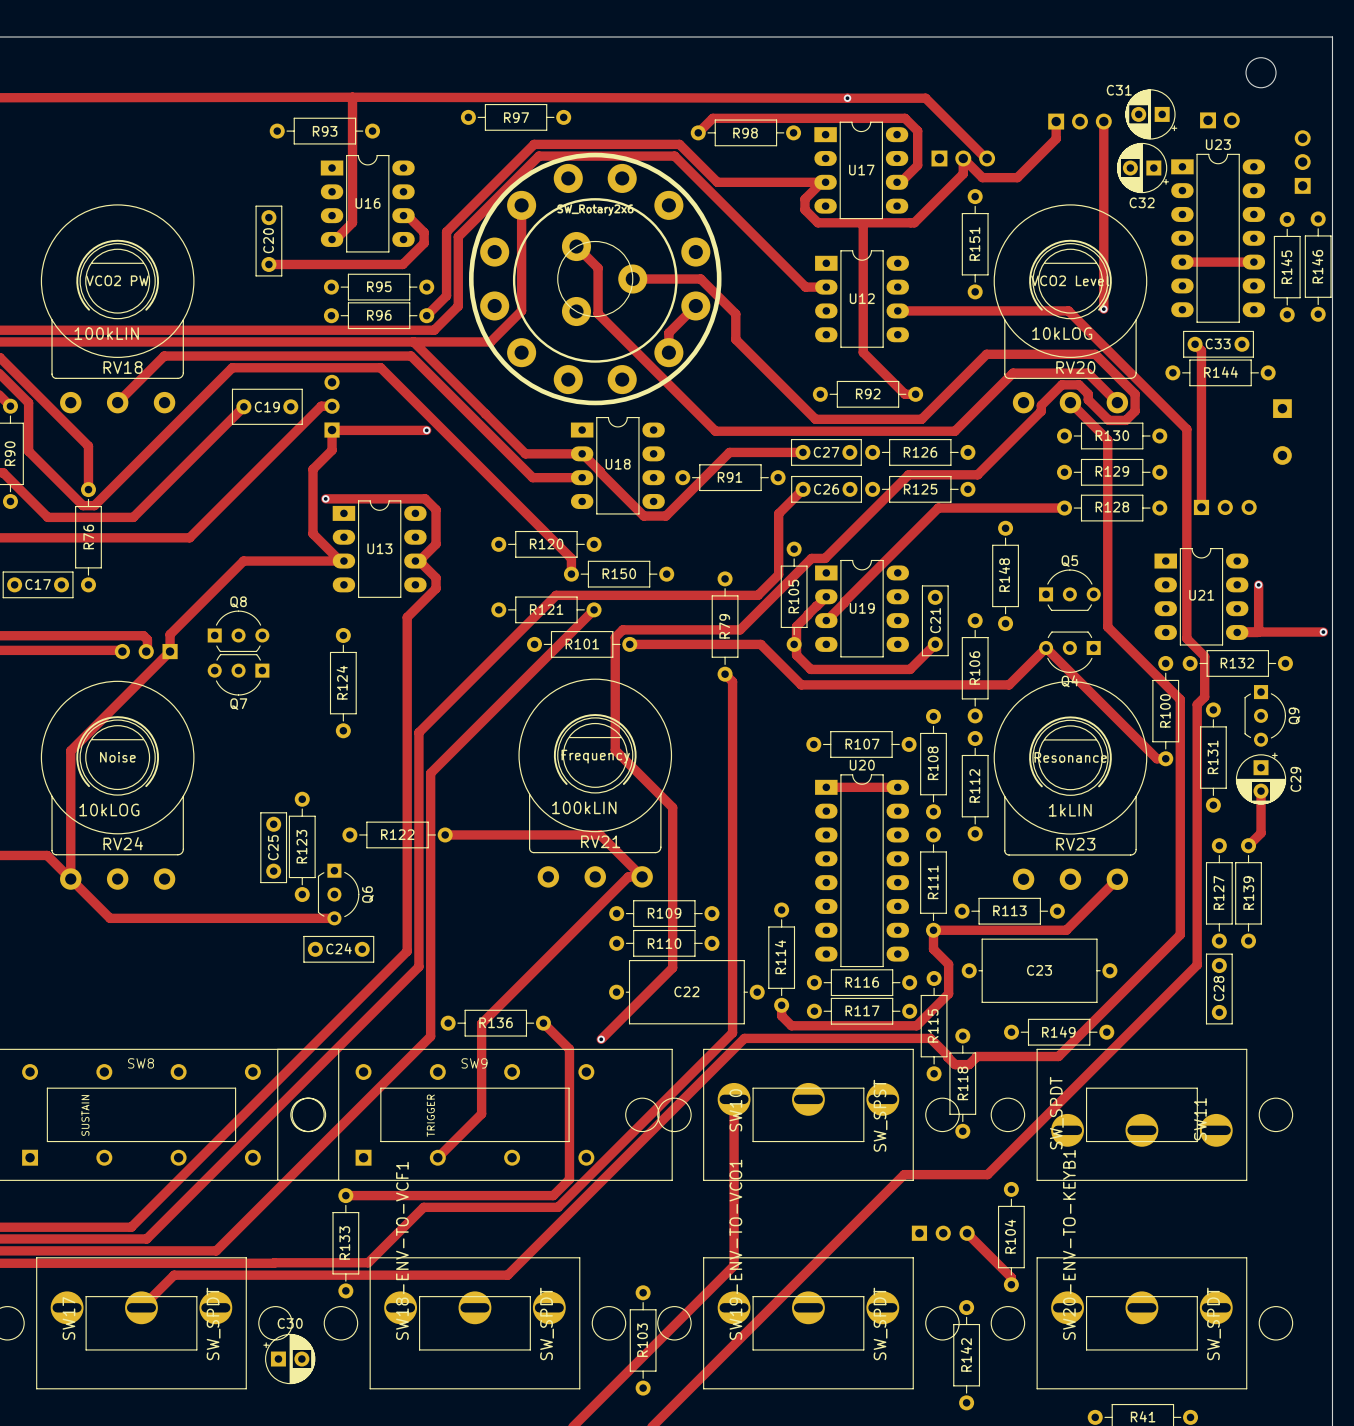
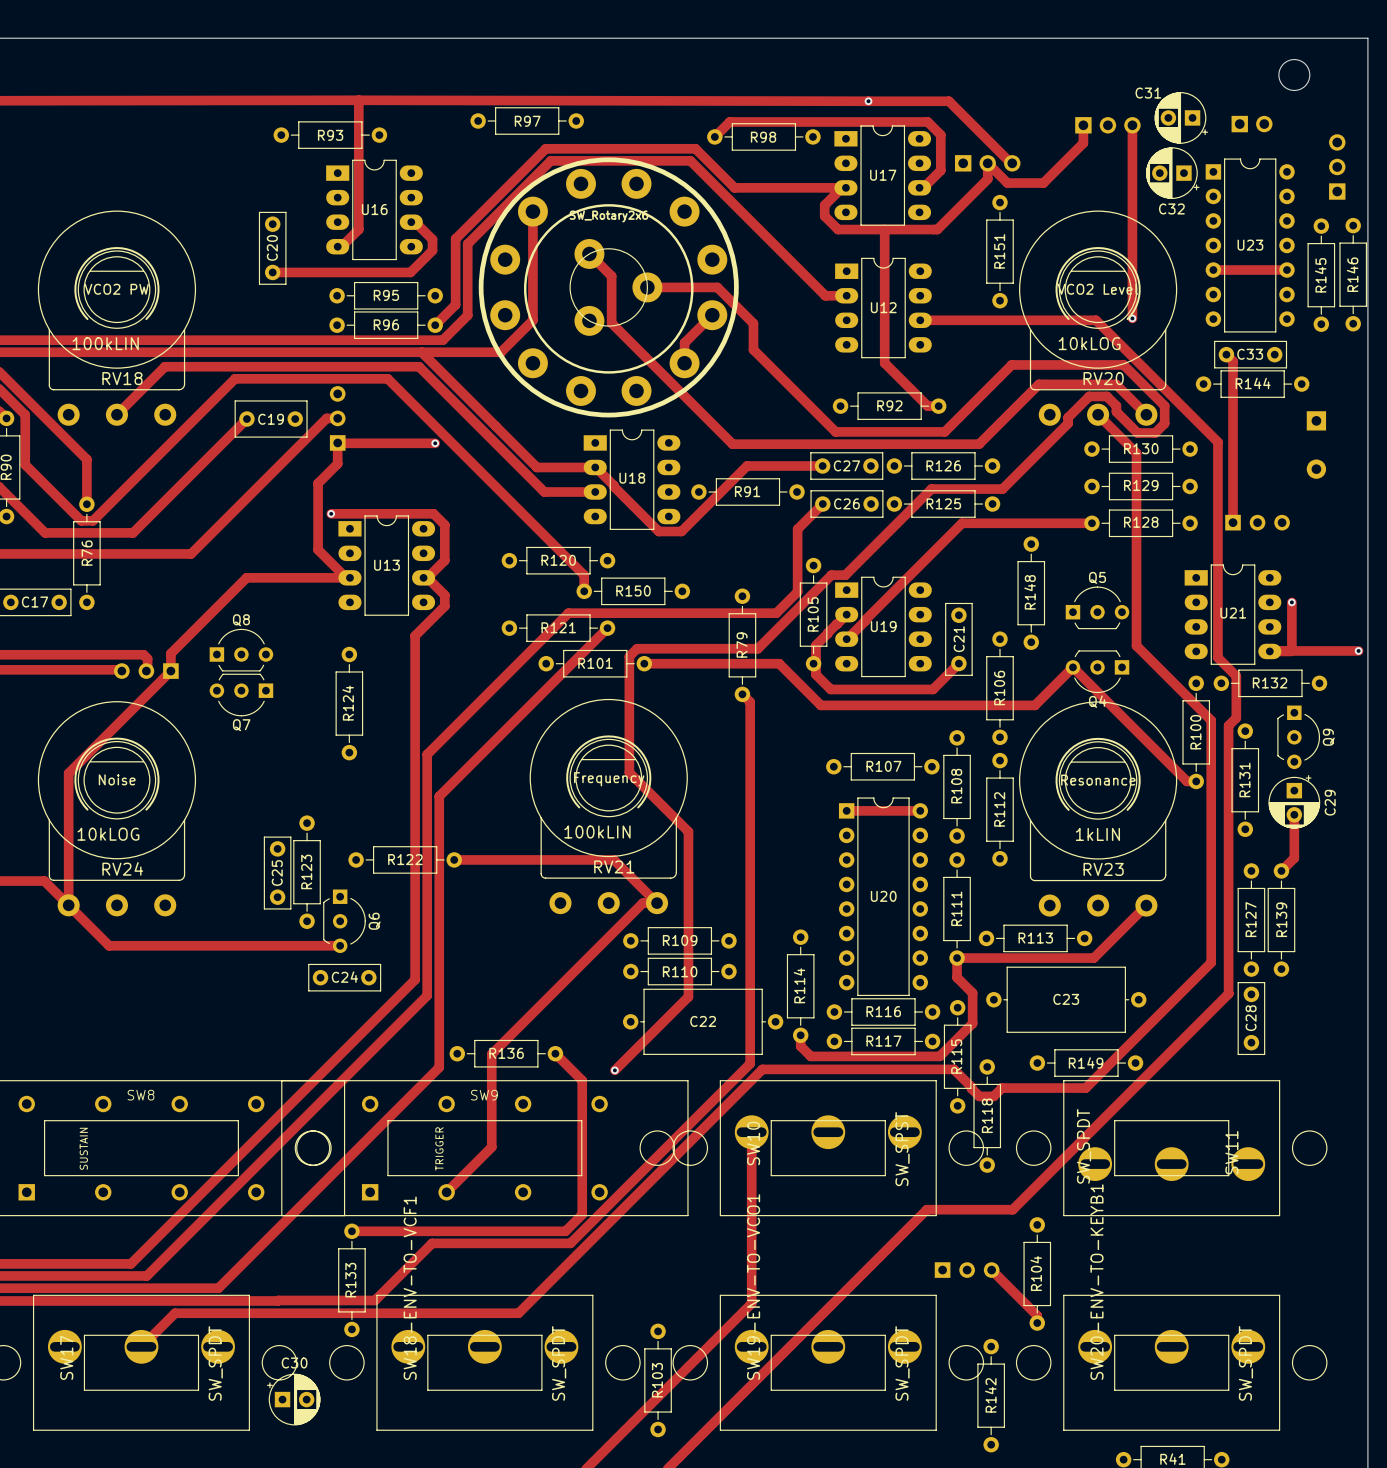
U23 name position: U23 (1218, 144) -> U23 (1250, 245)
U23 footprint: [1171, 153, 1266, 323] -> [1205, 158, 1295, 333]
U20 name position: U20 (862, 765) -> U20 (883, 896)
U20 footprint: [815, 774, 910, 968] -> [838, 797, 929, 997]

